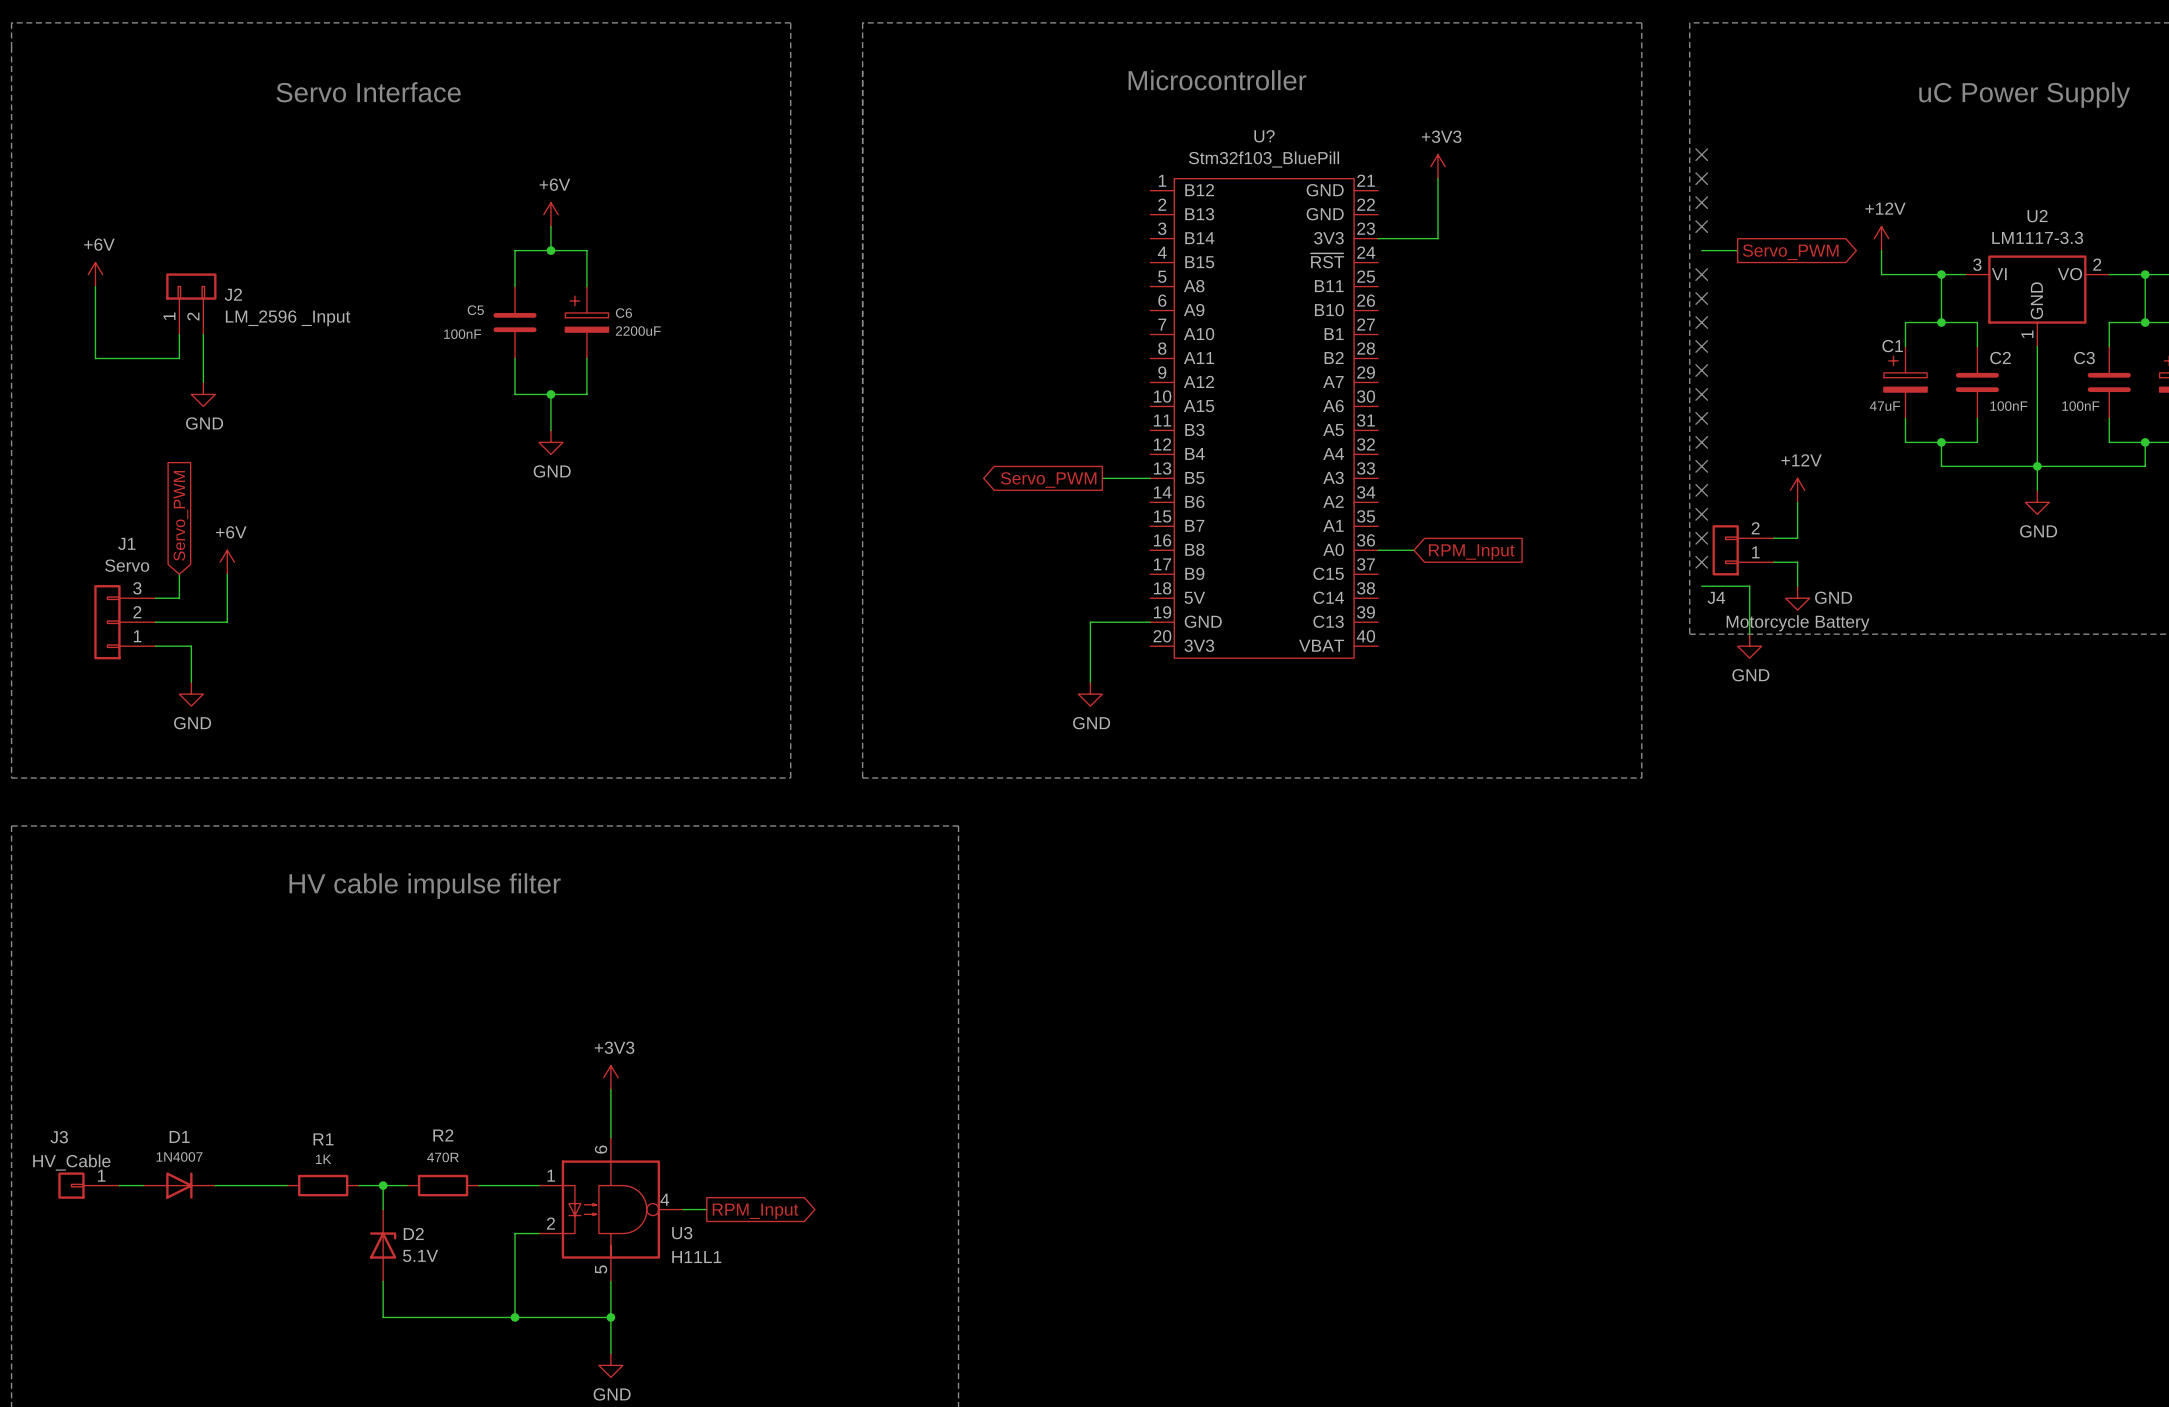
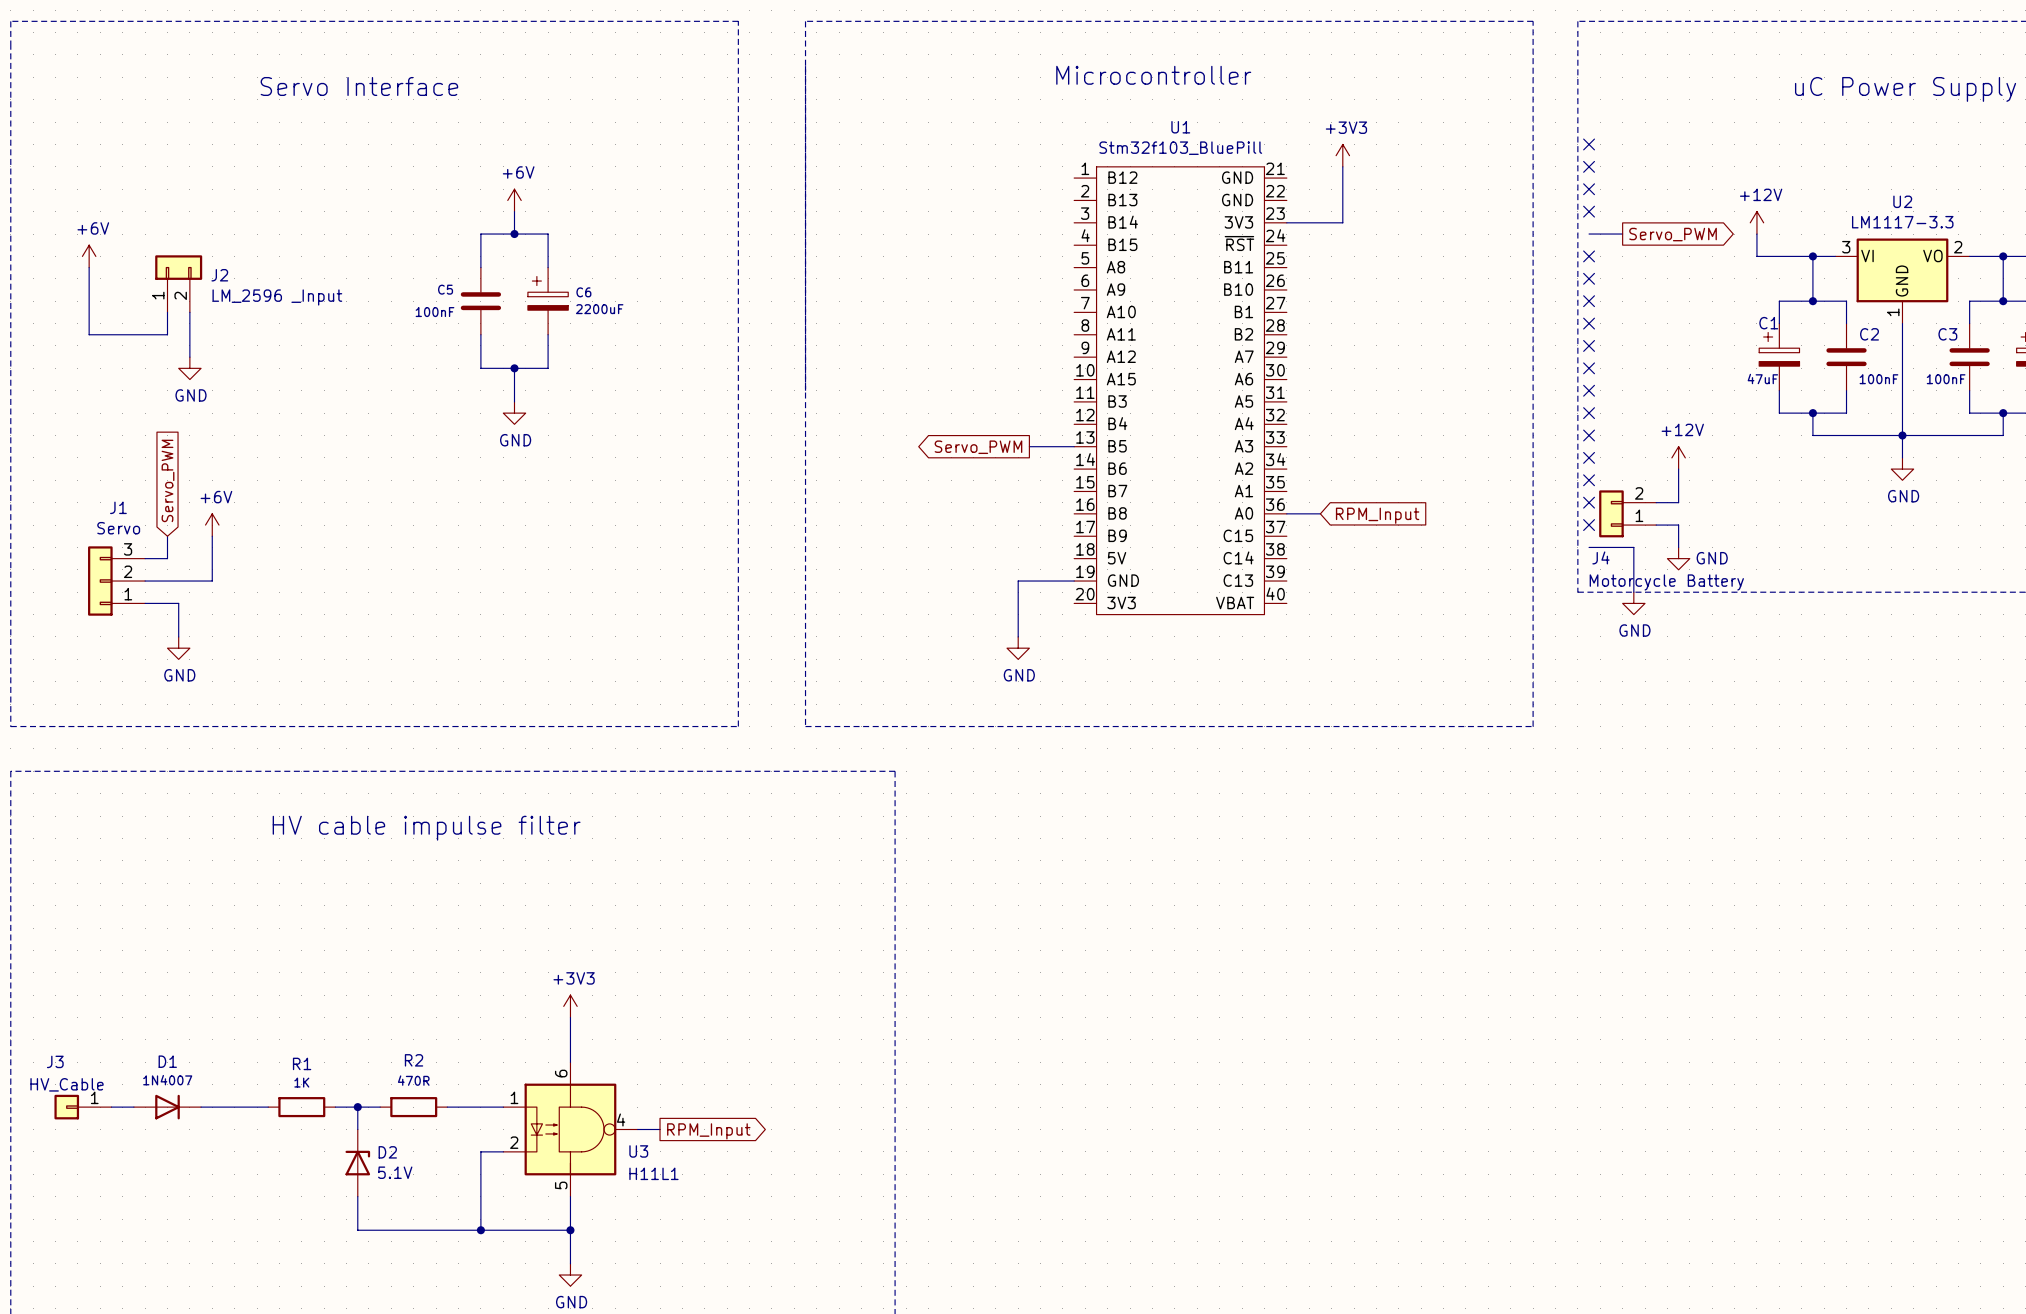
U? name: U? (1264, 136) -> U1 (1180, 127)

